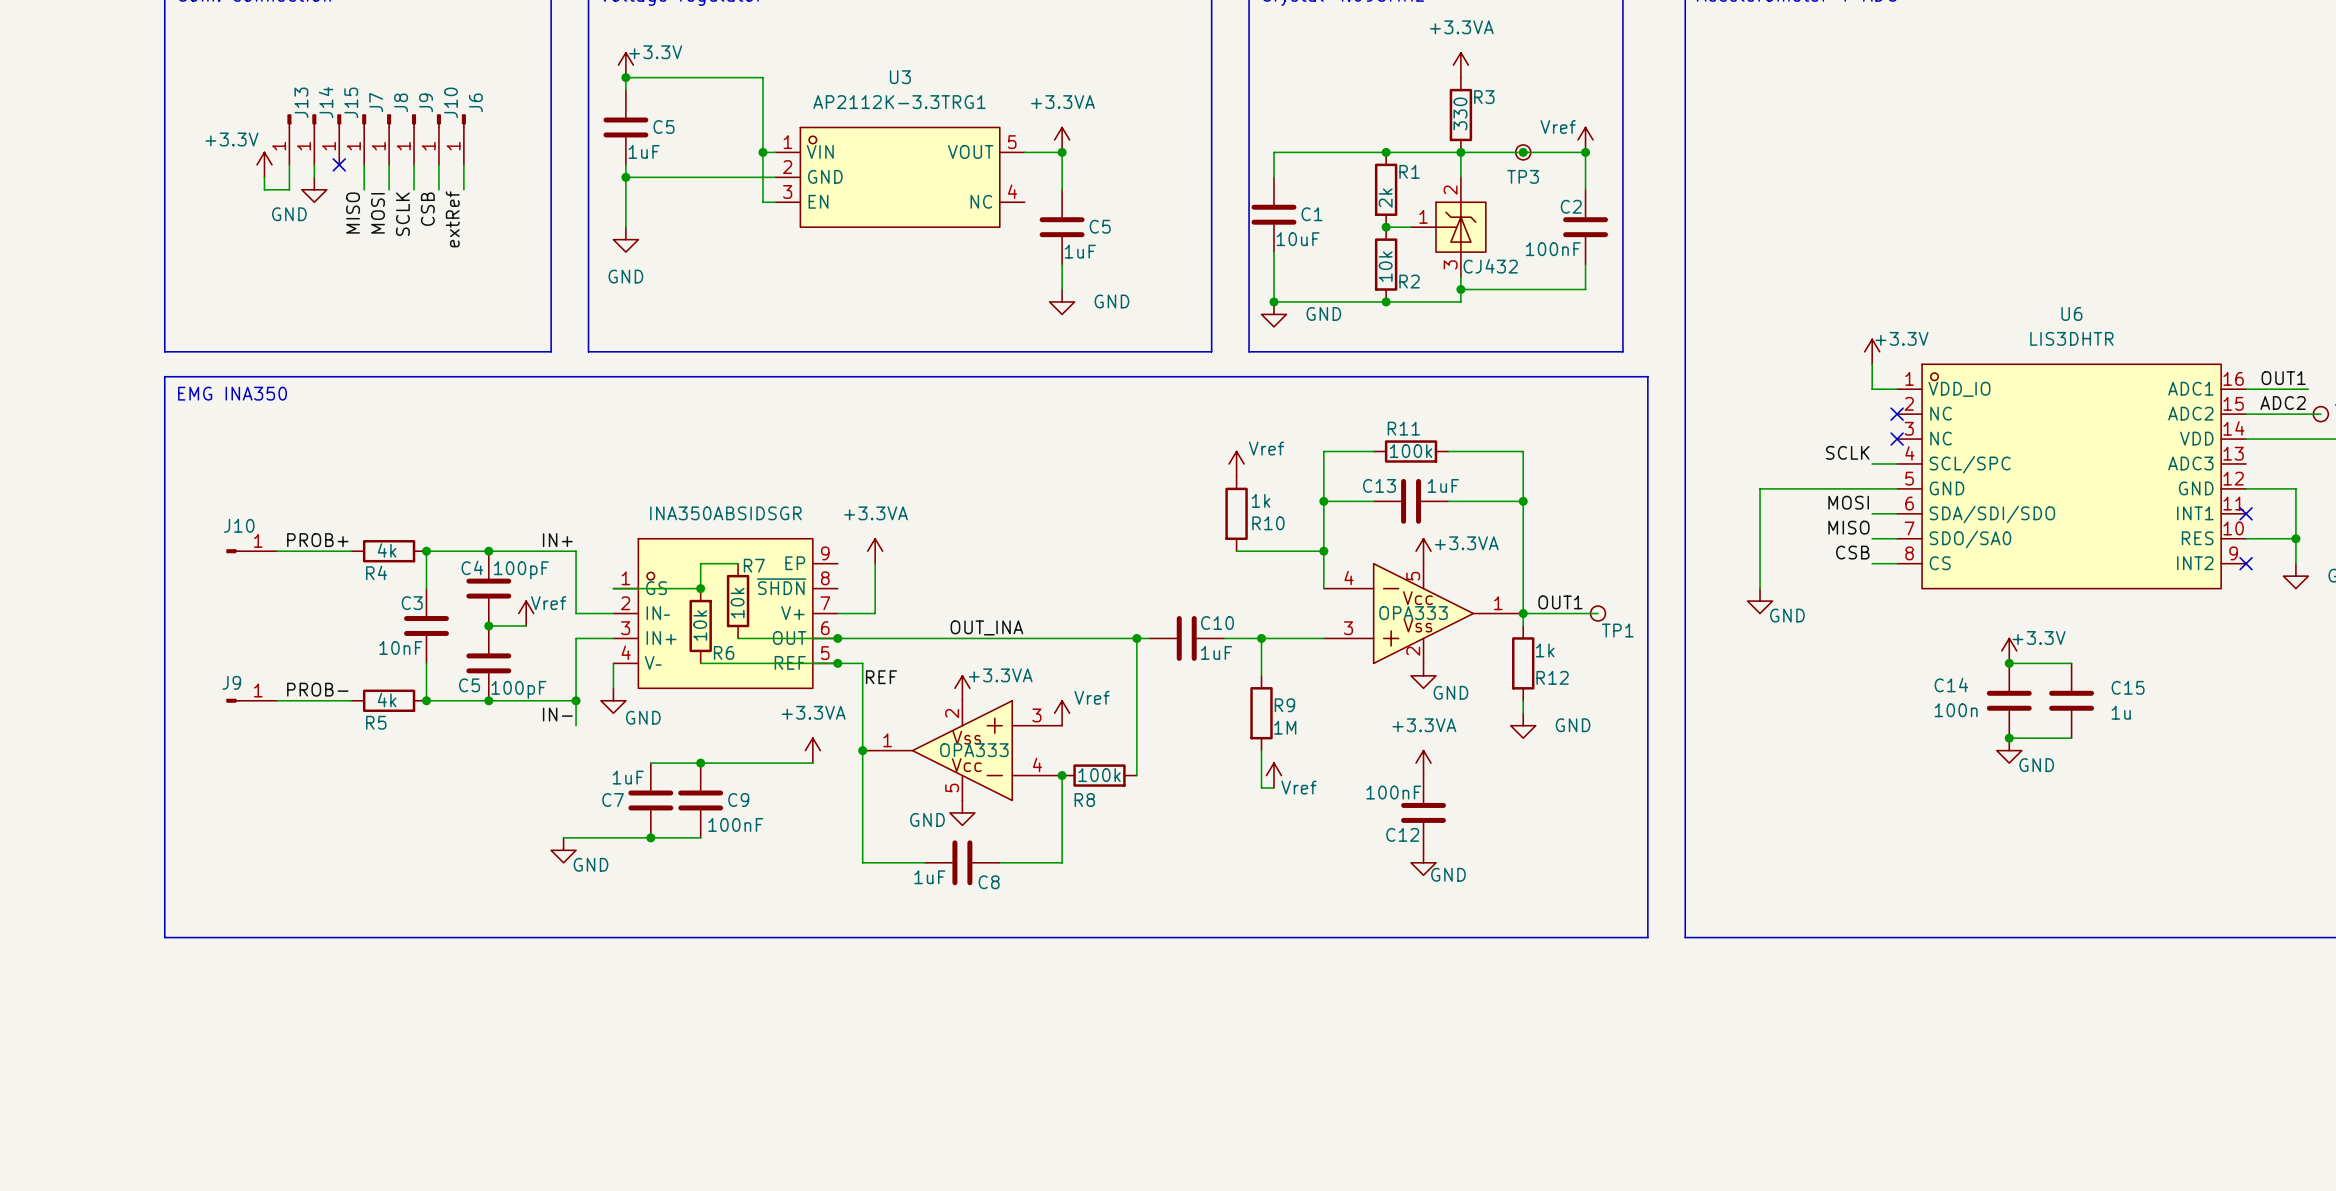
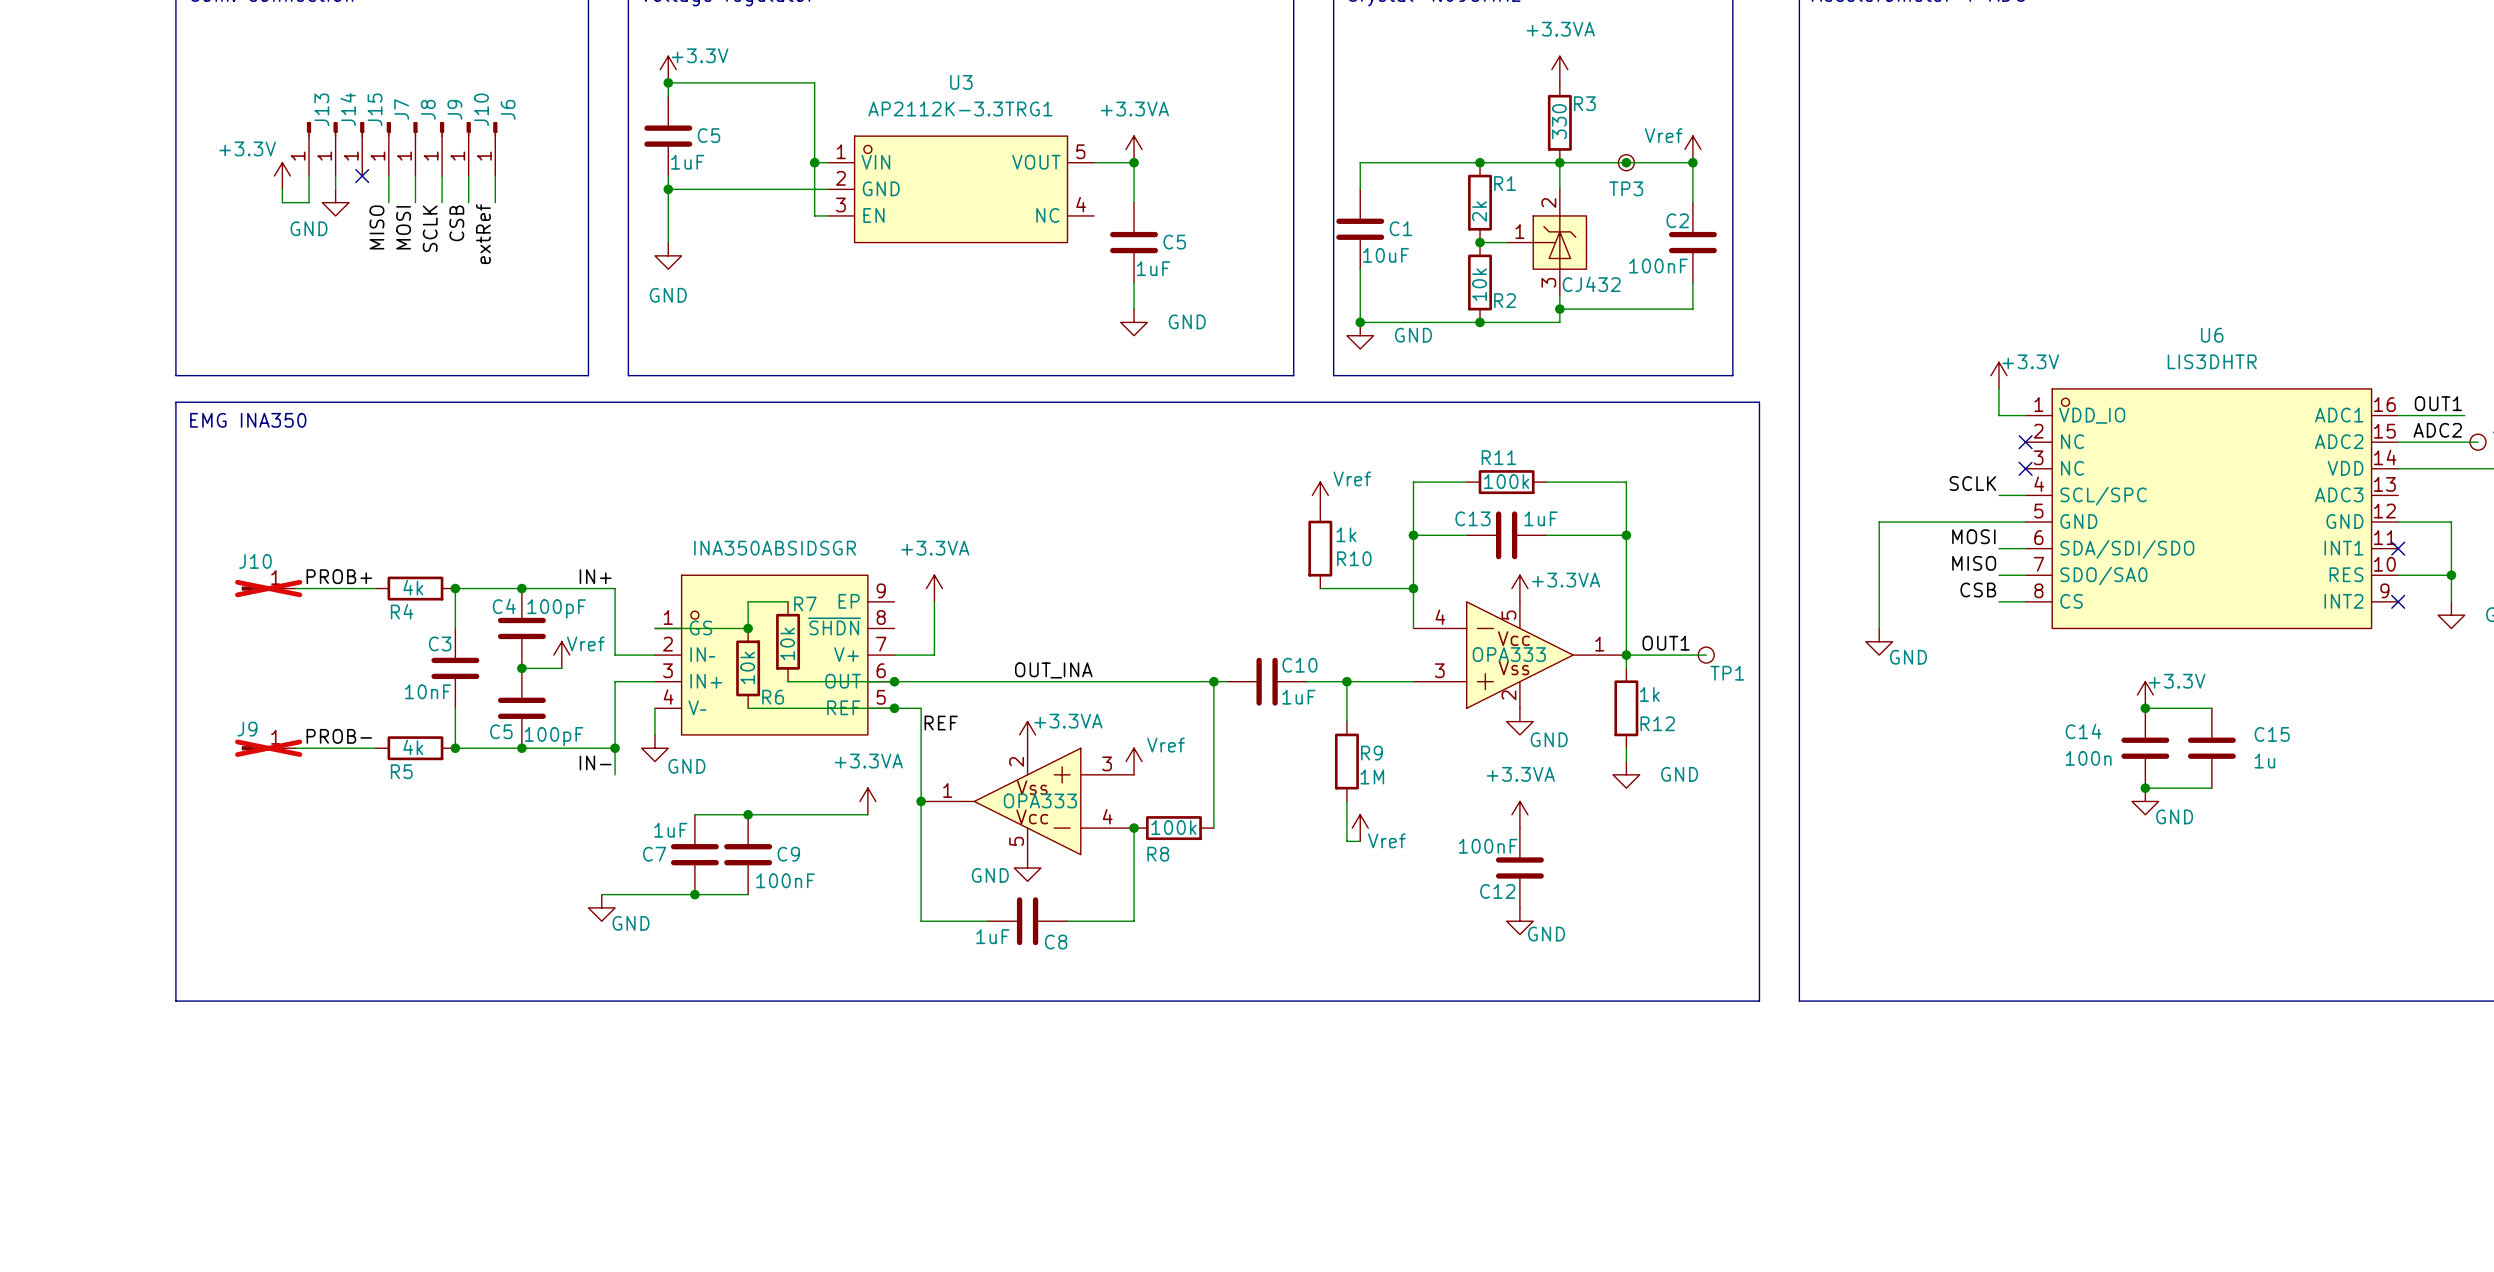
J10 do-not-place cross: none -> (268, 588)
J9 do-not-place cross: none -> (268, 748)

